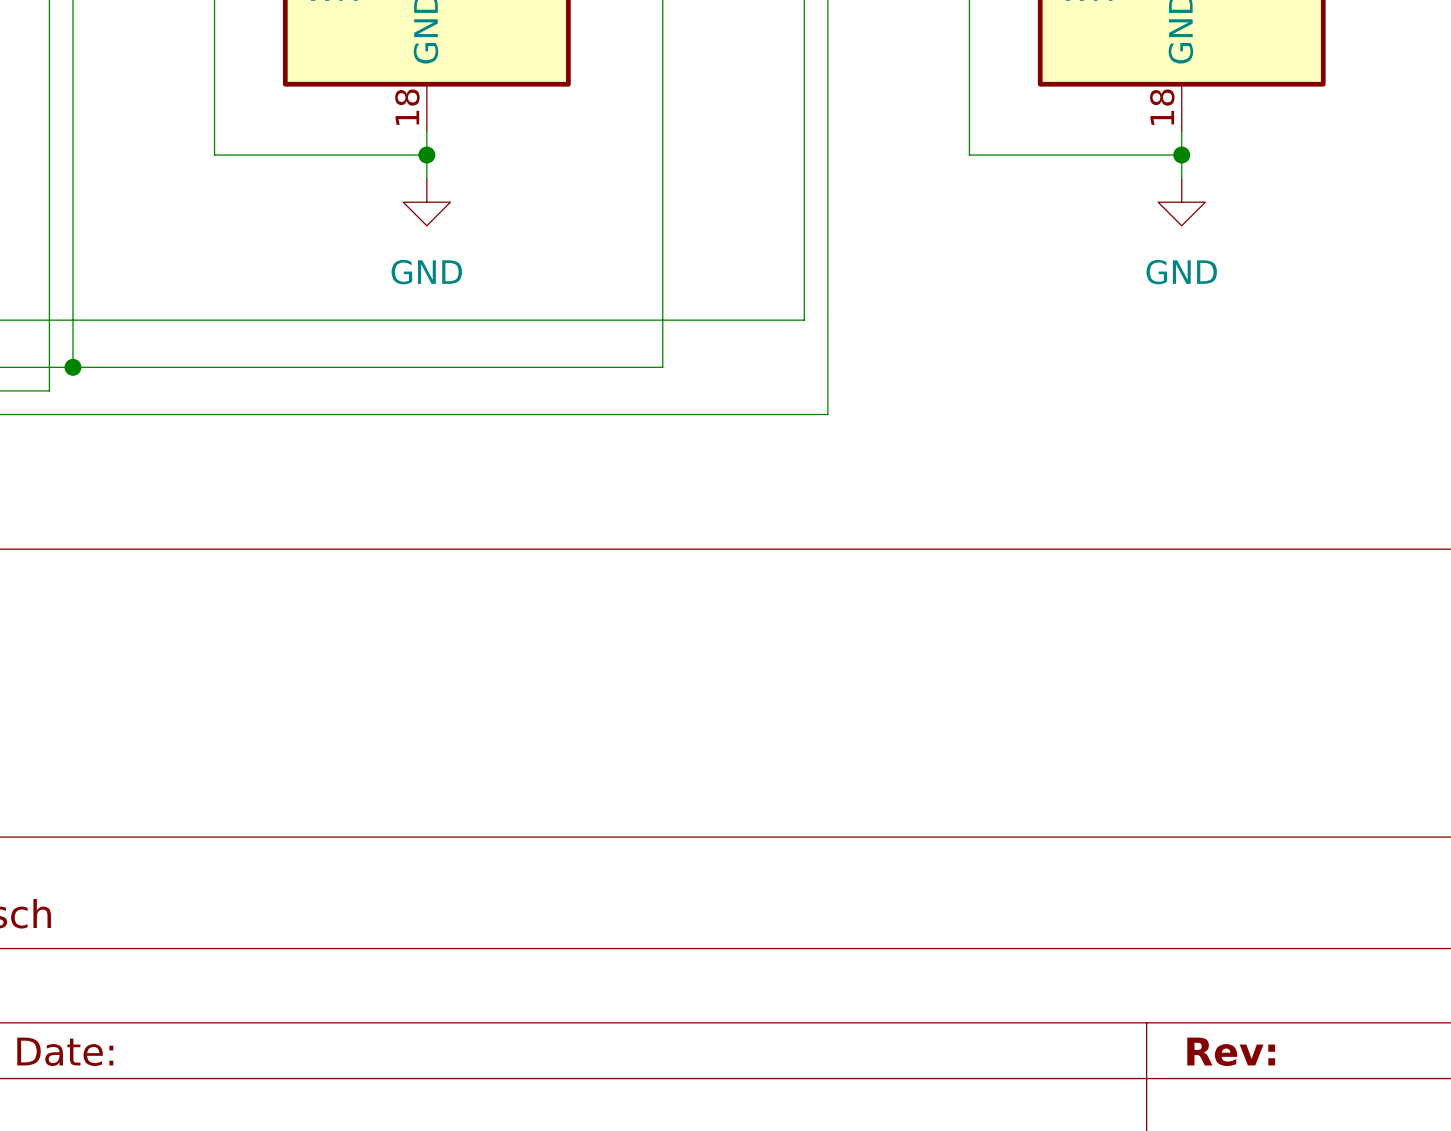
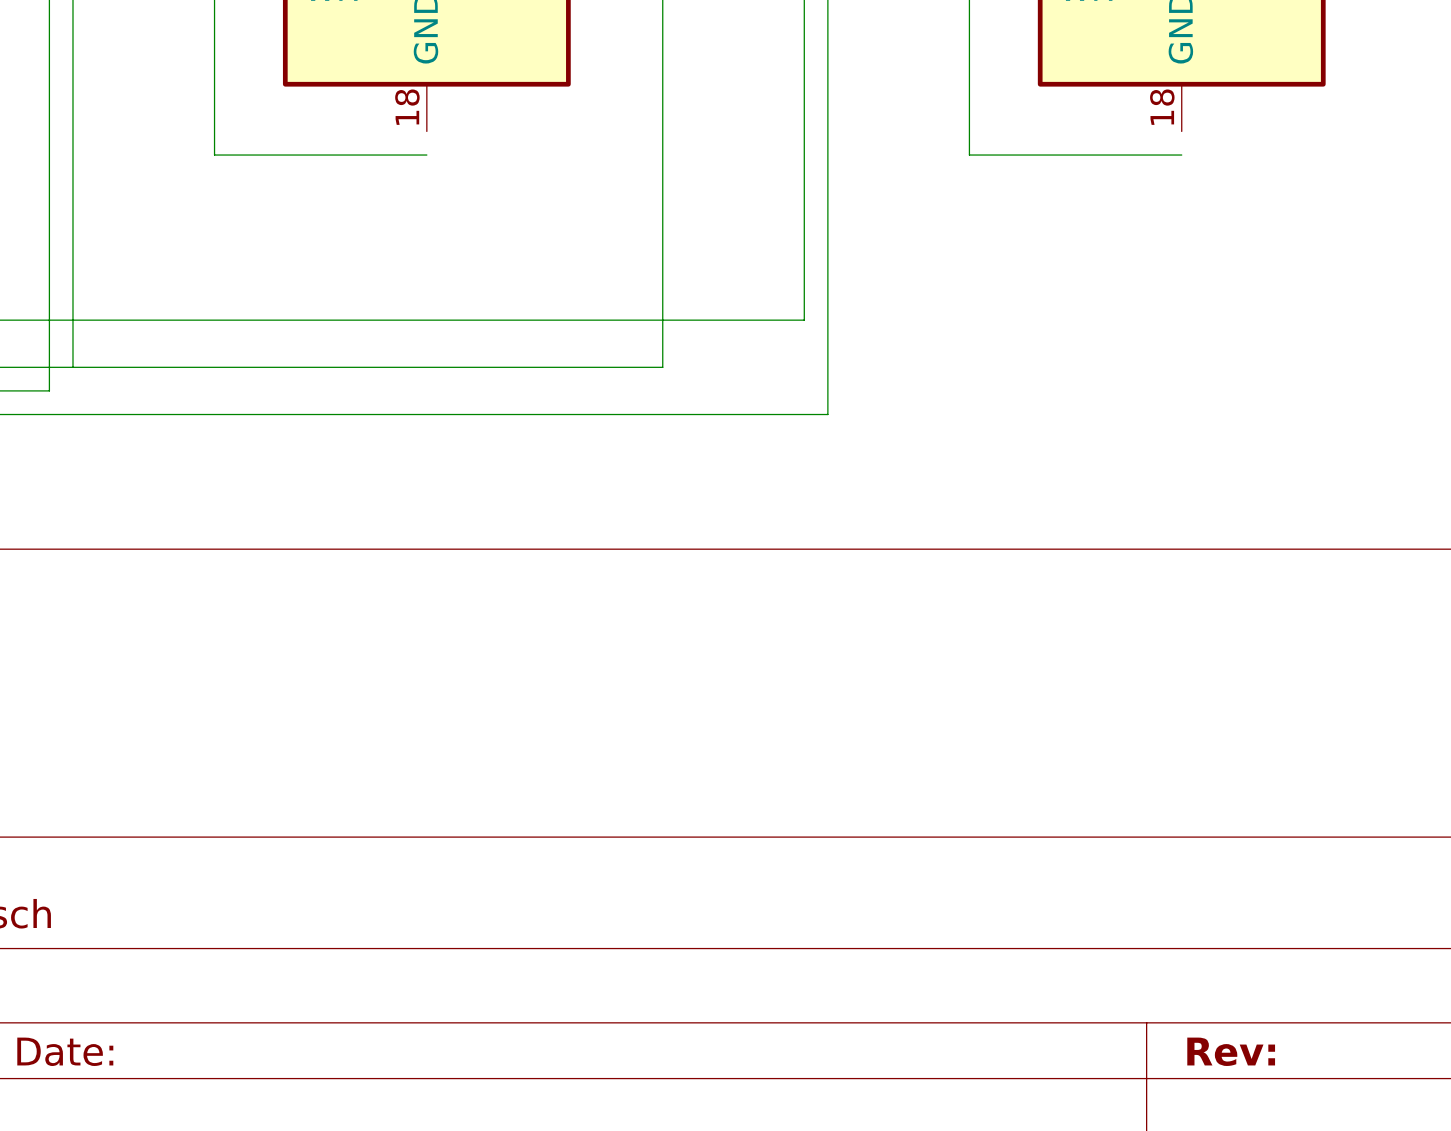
wire: (426, 131) (426, 178) -> none
wire: (1181, 131) (1181, 178) -> none
junction: (426, 155) -> none
junction: (1181, 155) -> none
power symbol: GND (426, 202) -> none
power symbol: GND (1181, 202) -> none
junction: (72, 367) -> none

